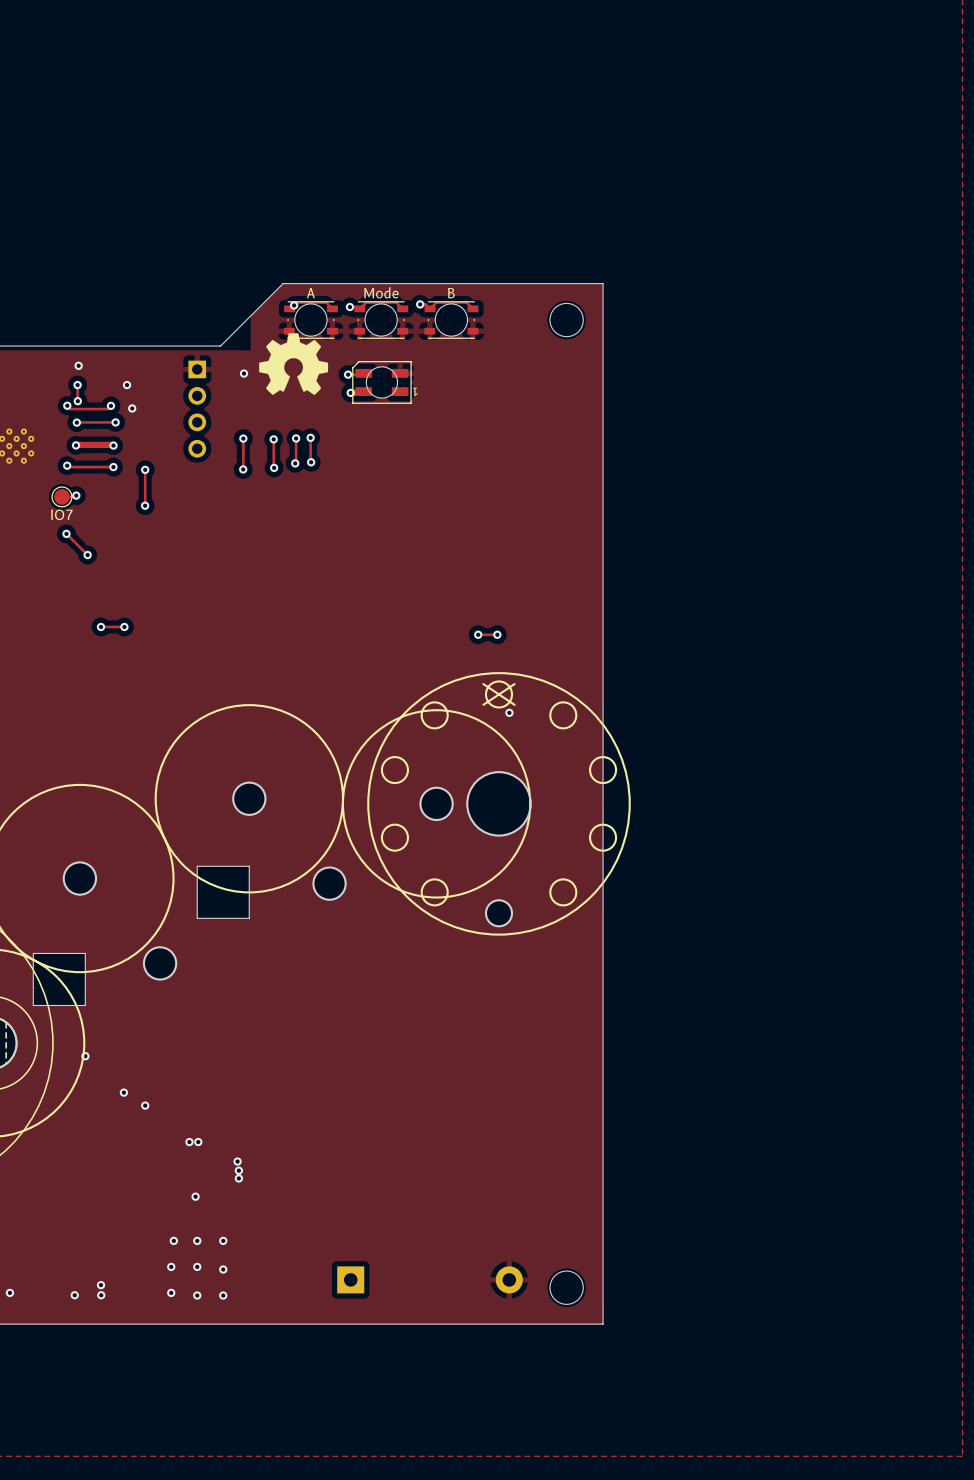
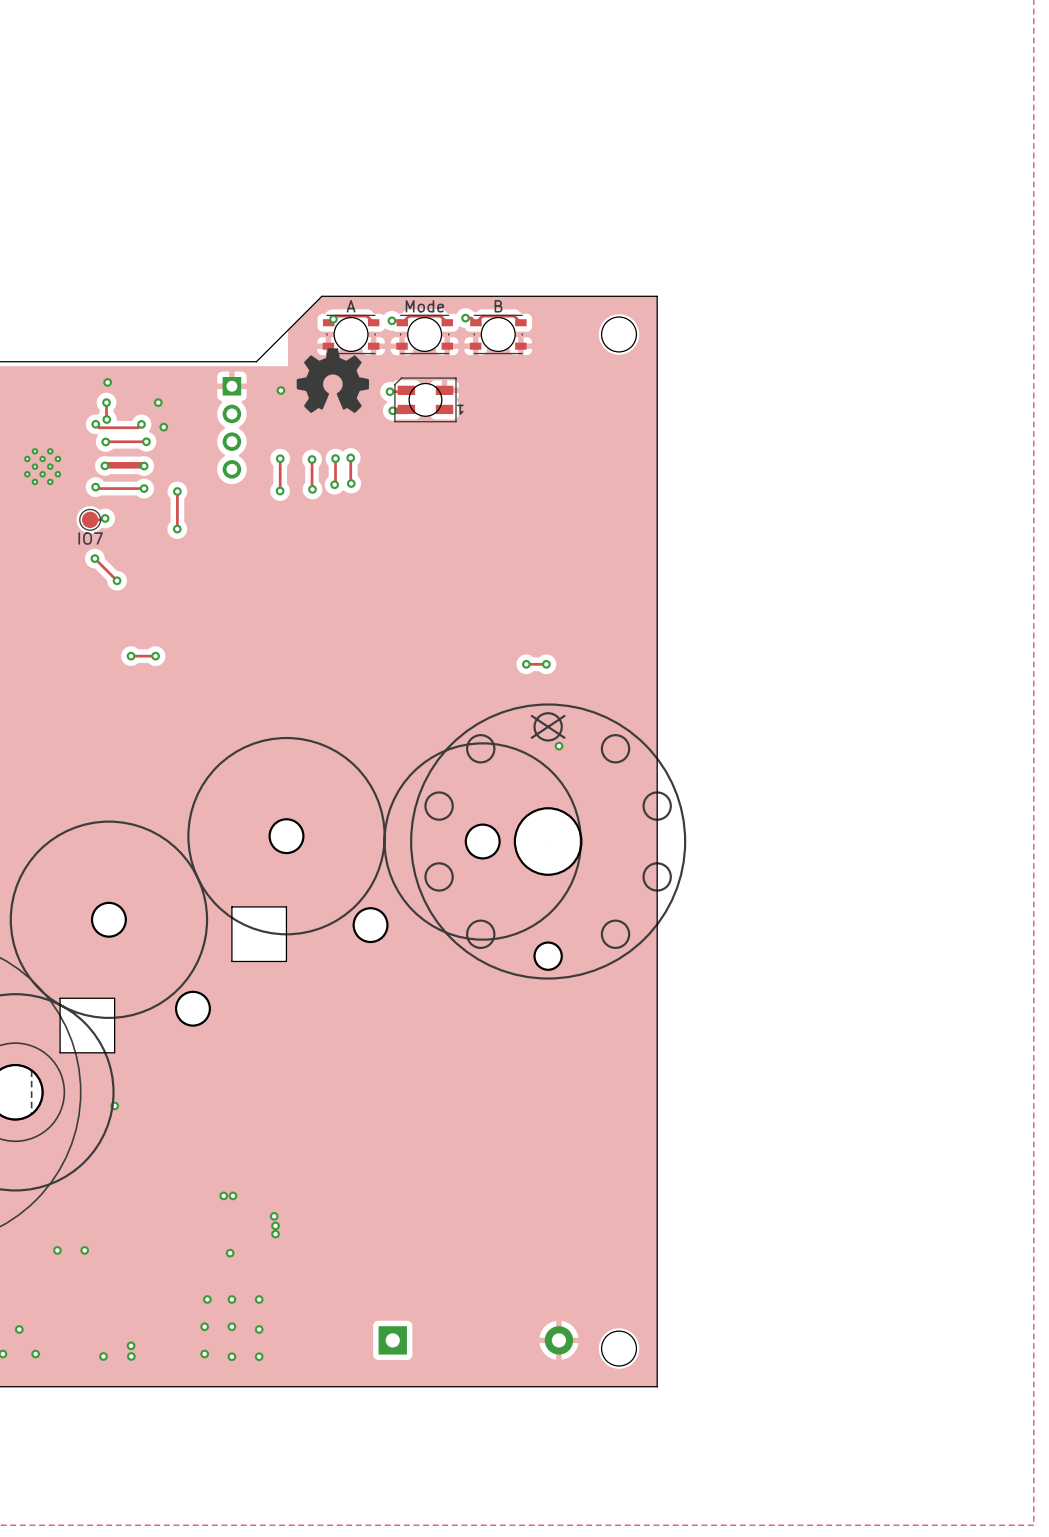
via: (123, 1092) -> none
via: (145, 1105) -> none
via: none -> (57, 1250)
via: none -> (84, 1250)

